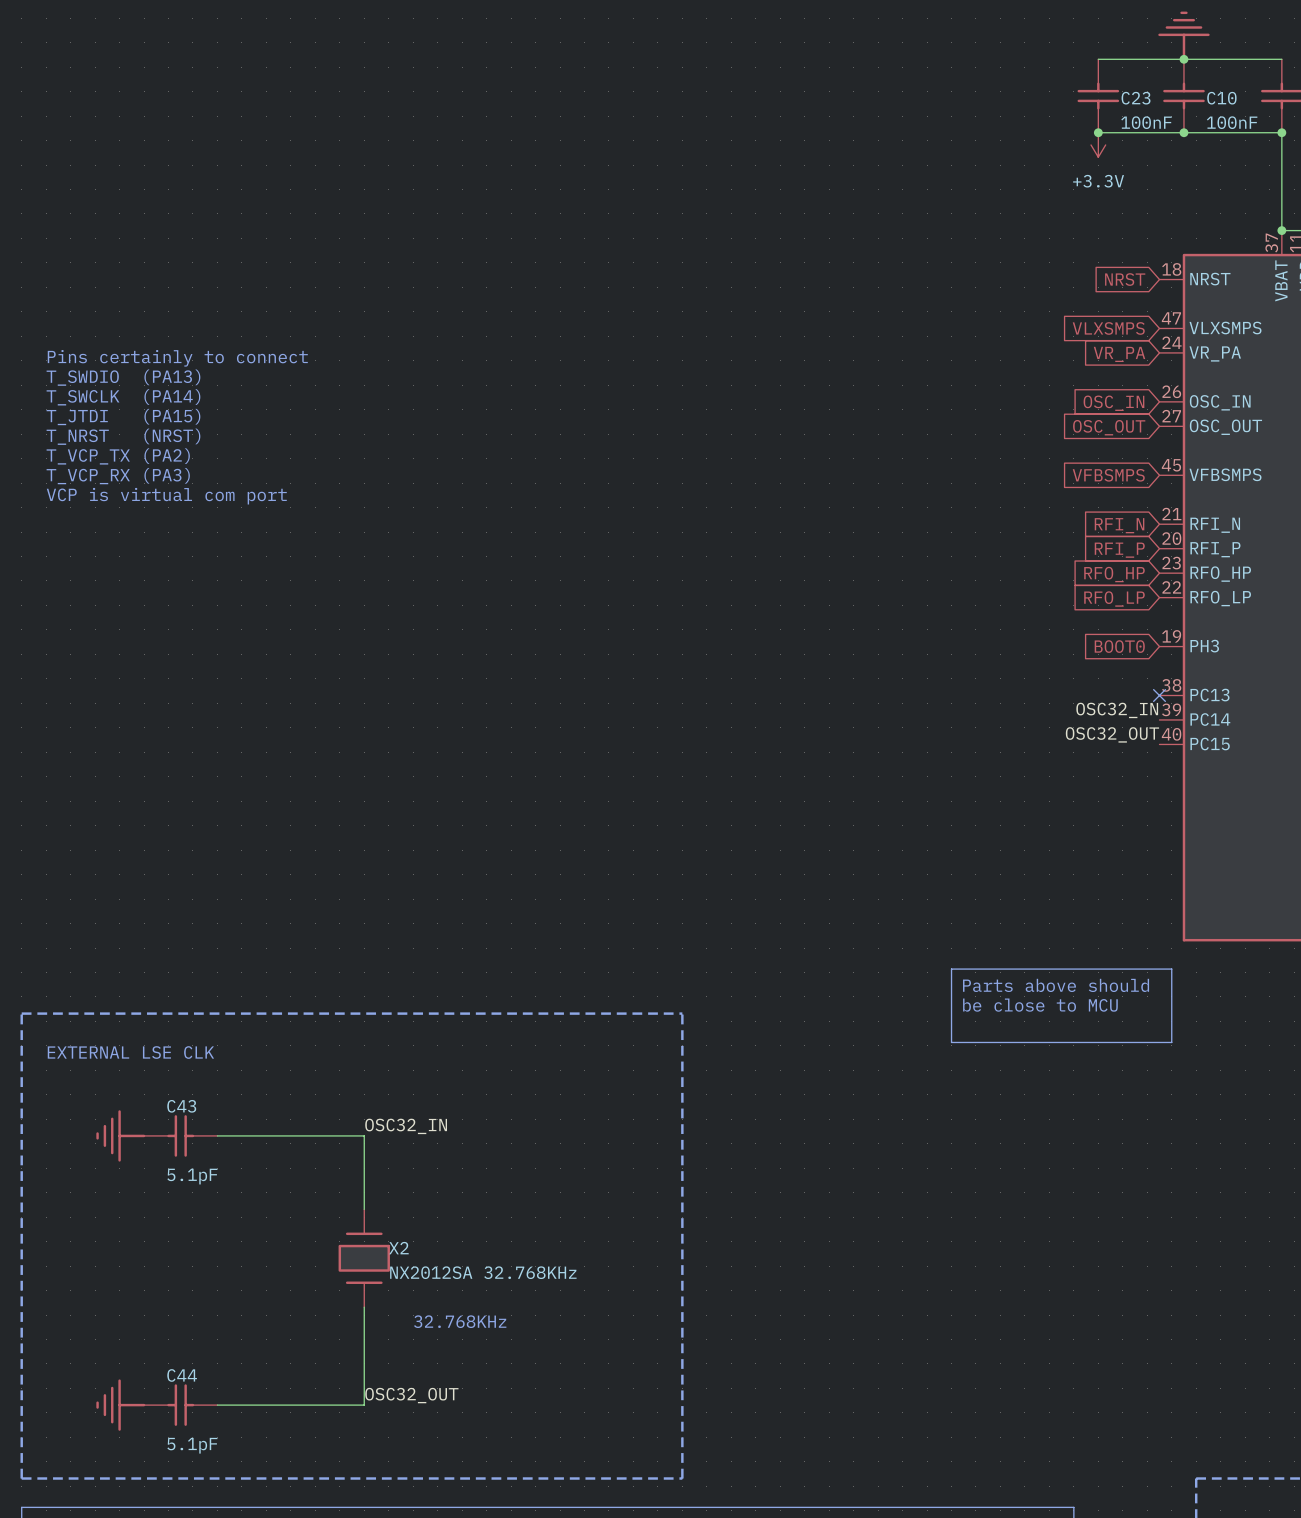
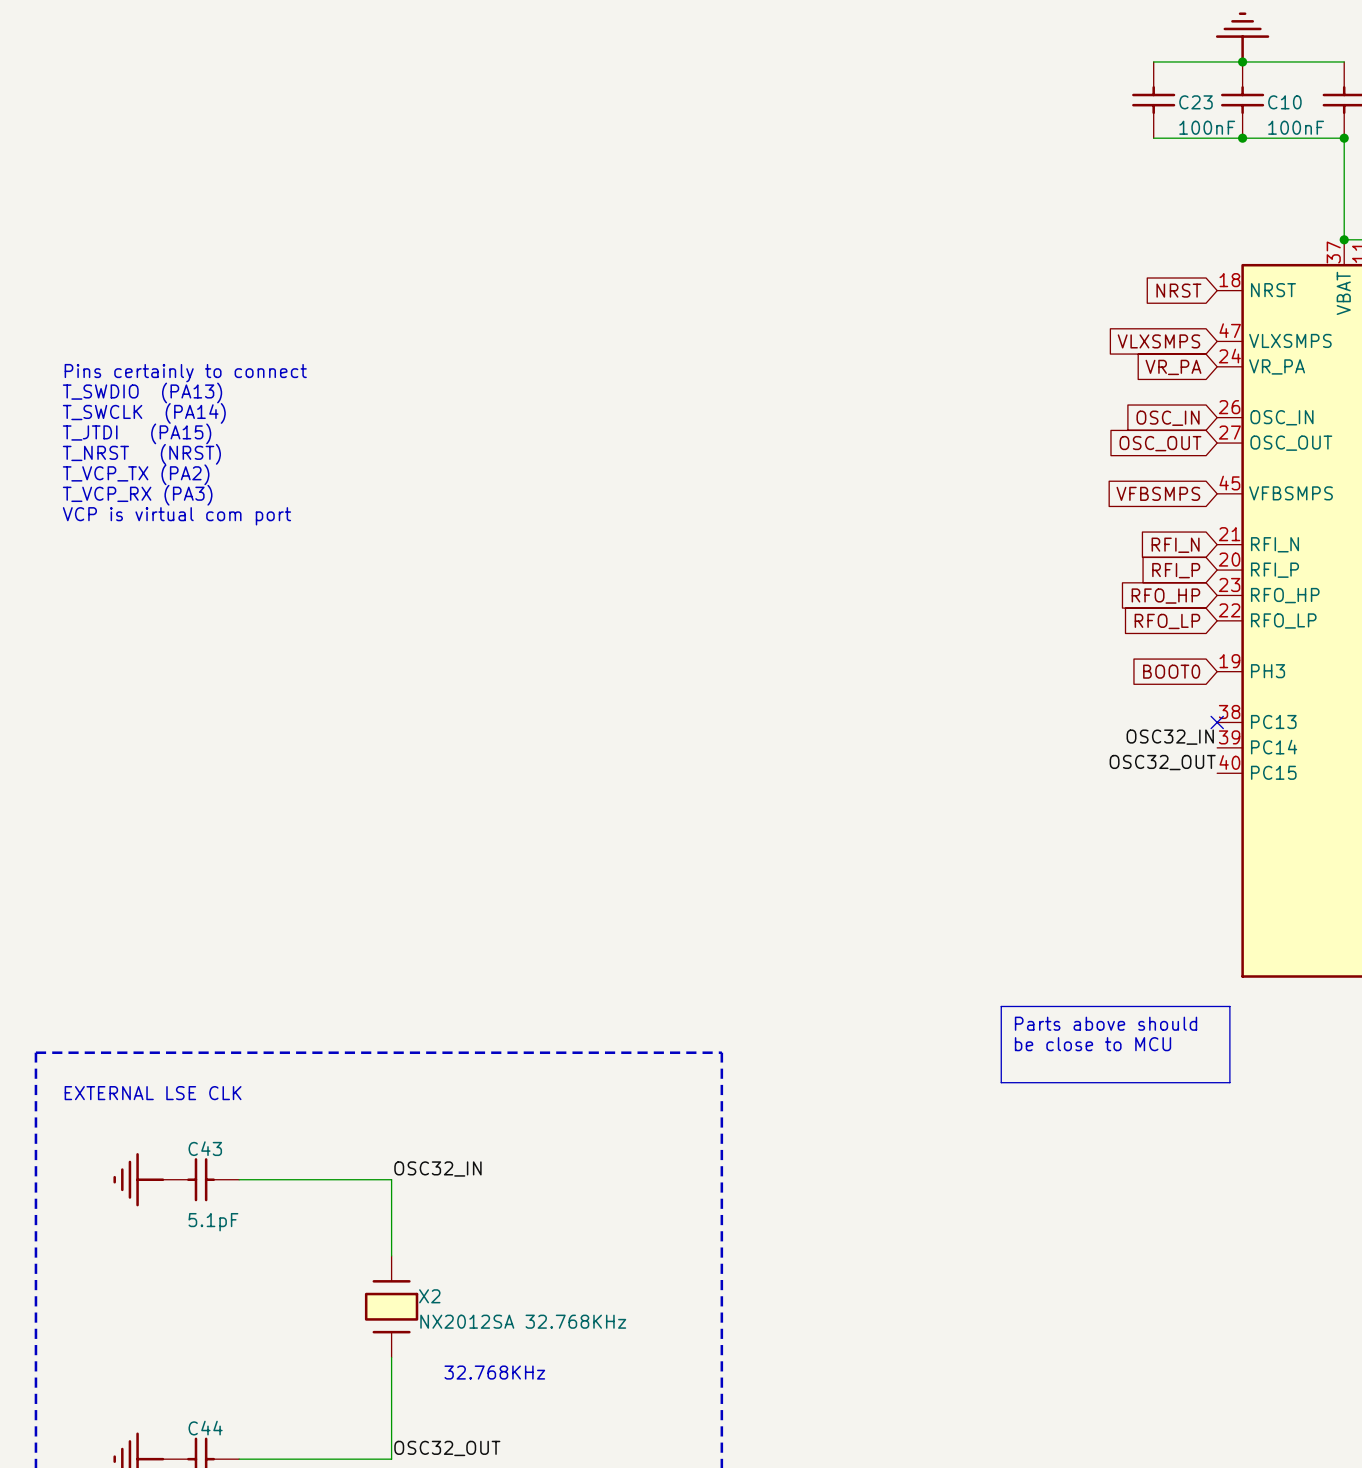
junction: (1098, 132) -> none
power symbol: +3.3V (1098, 144) -> none

